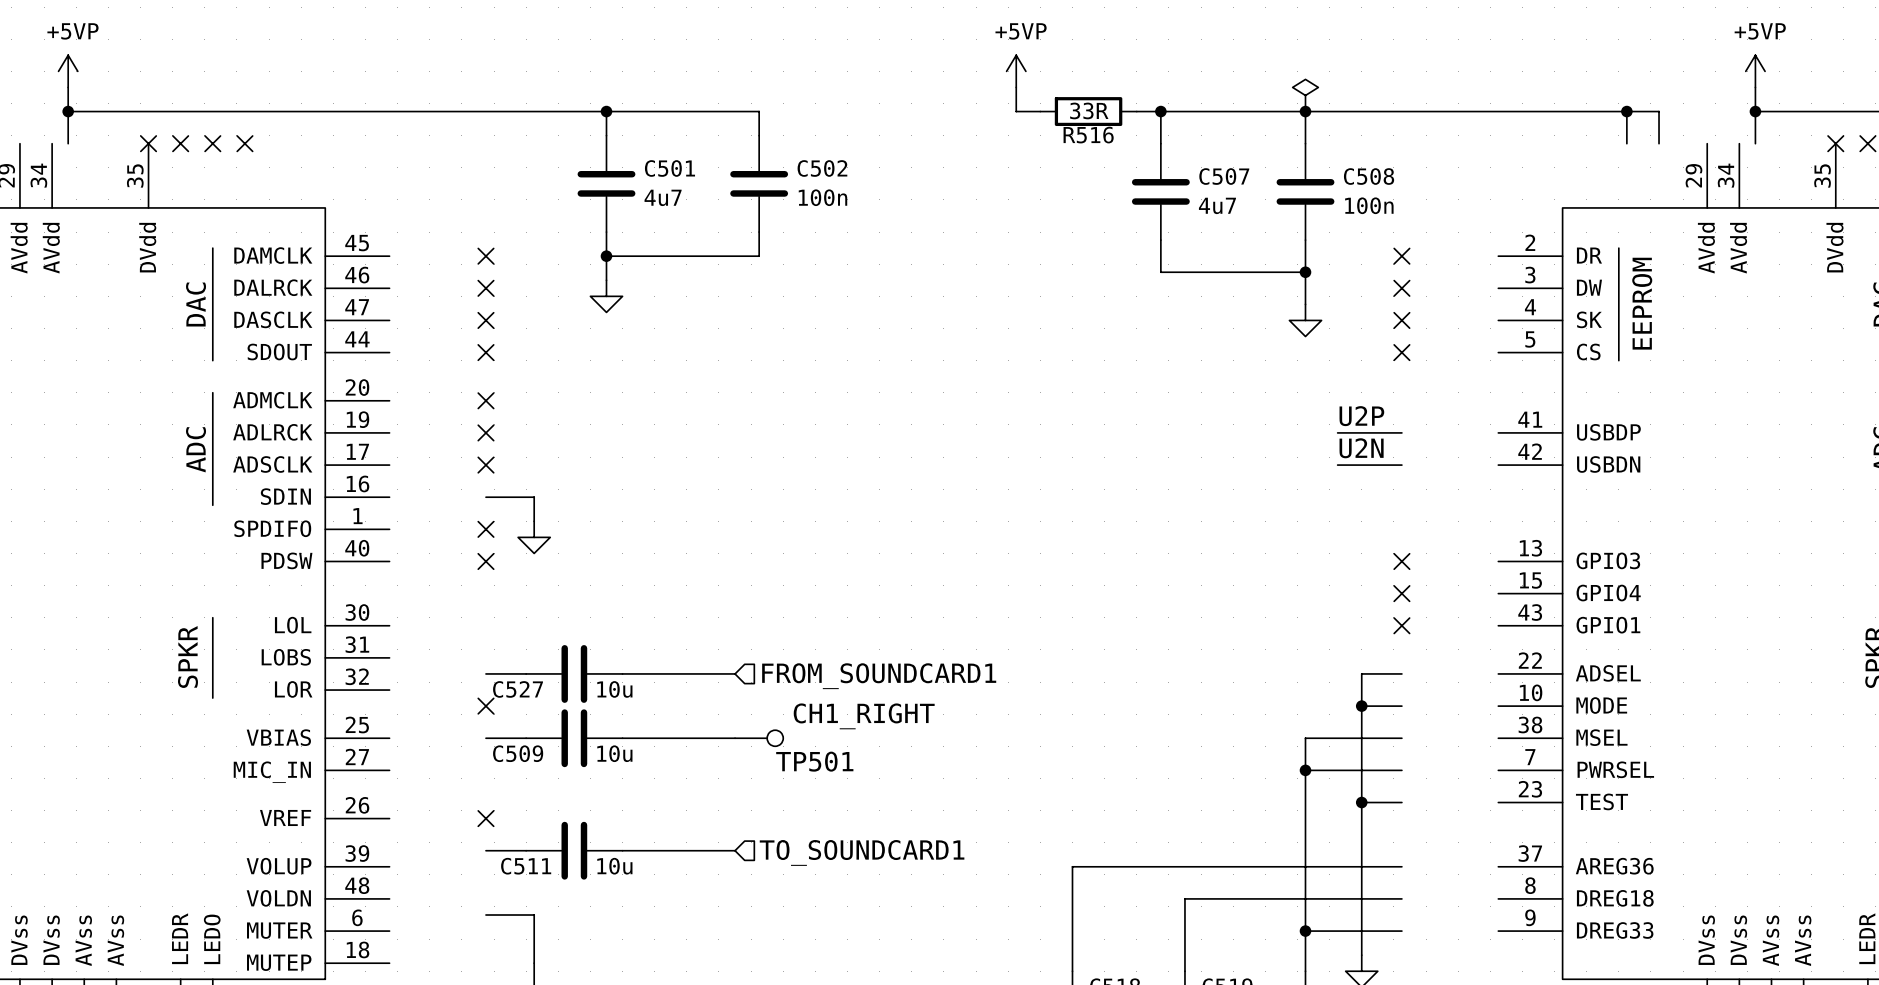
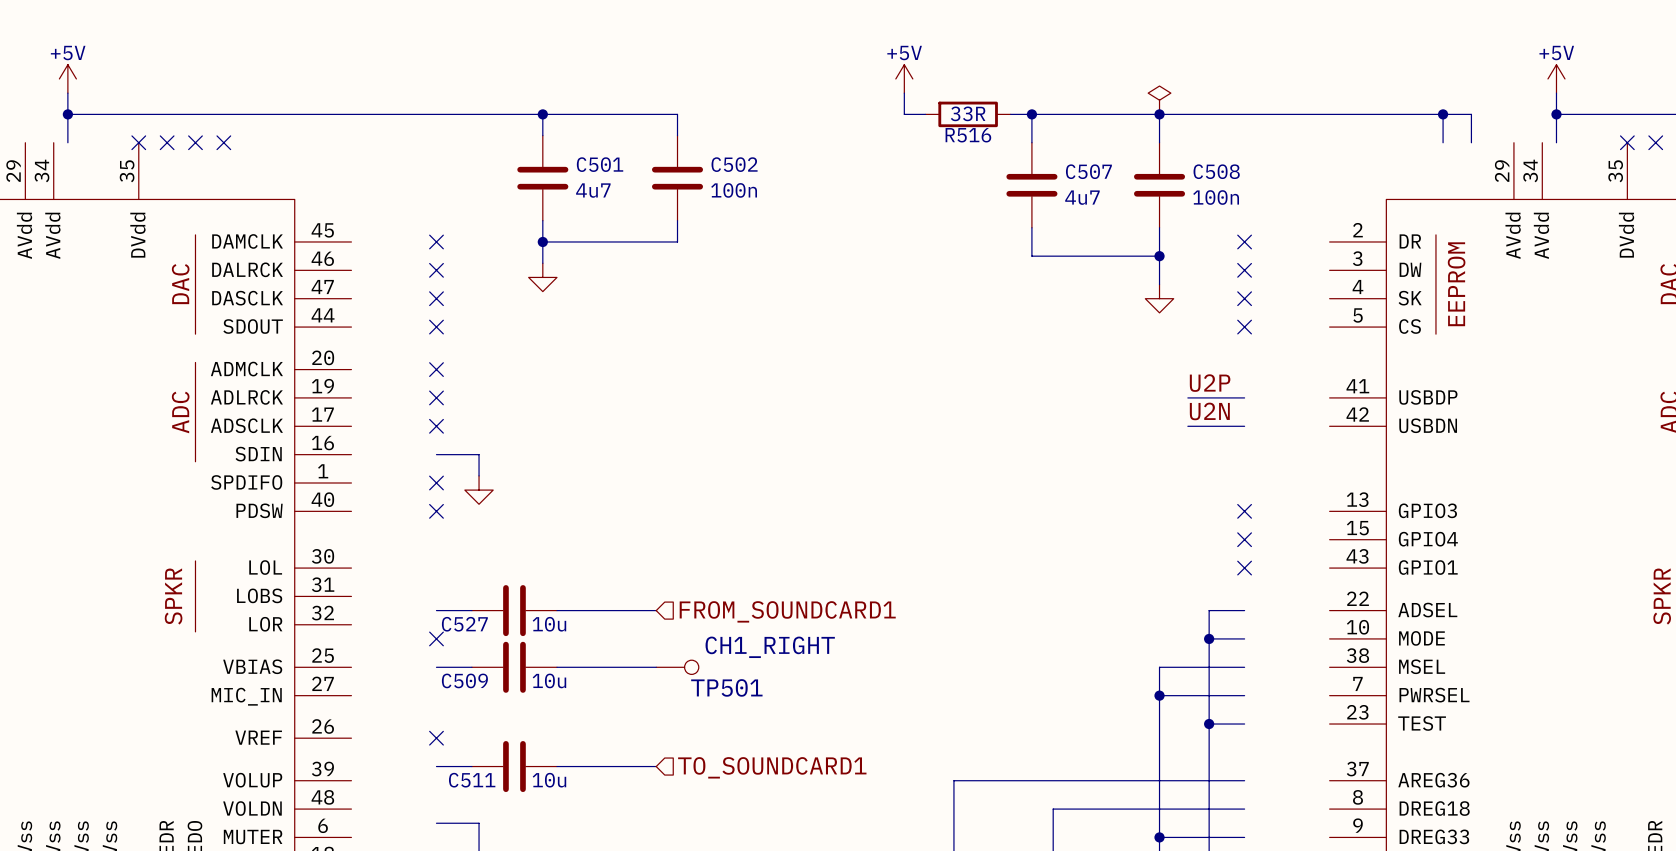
power symbol: +5VP (68, 71) -> +5V (67, 78)
power symbol: +5VP (1016, 71) -> +5V (904, 78)
power symbol: +5VP (1755, 71) -> +5V (1556, 78)

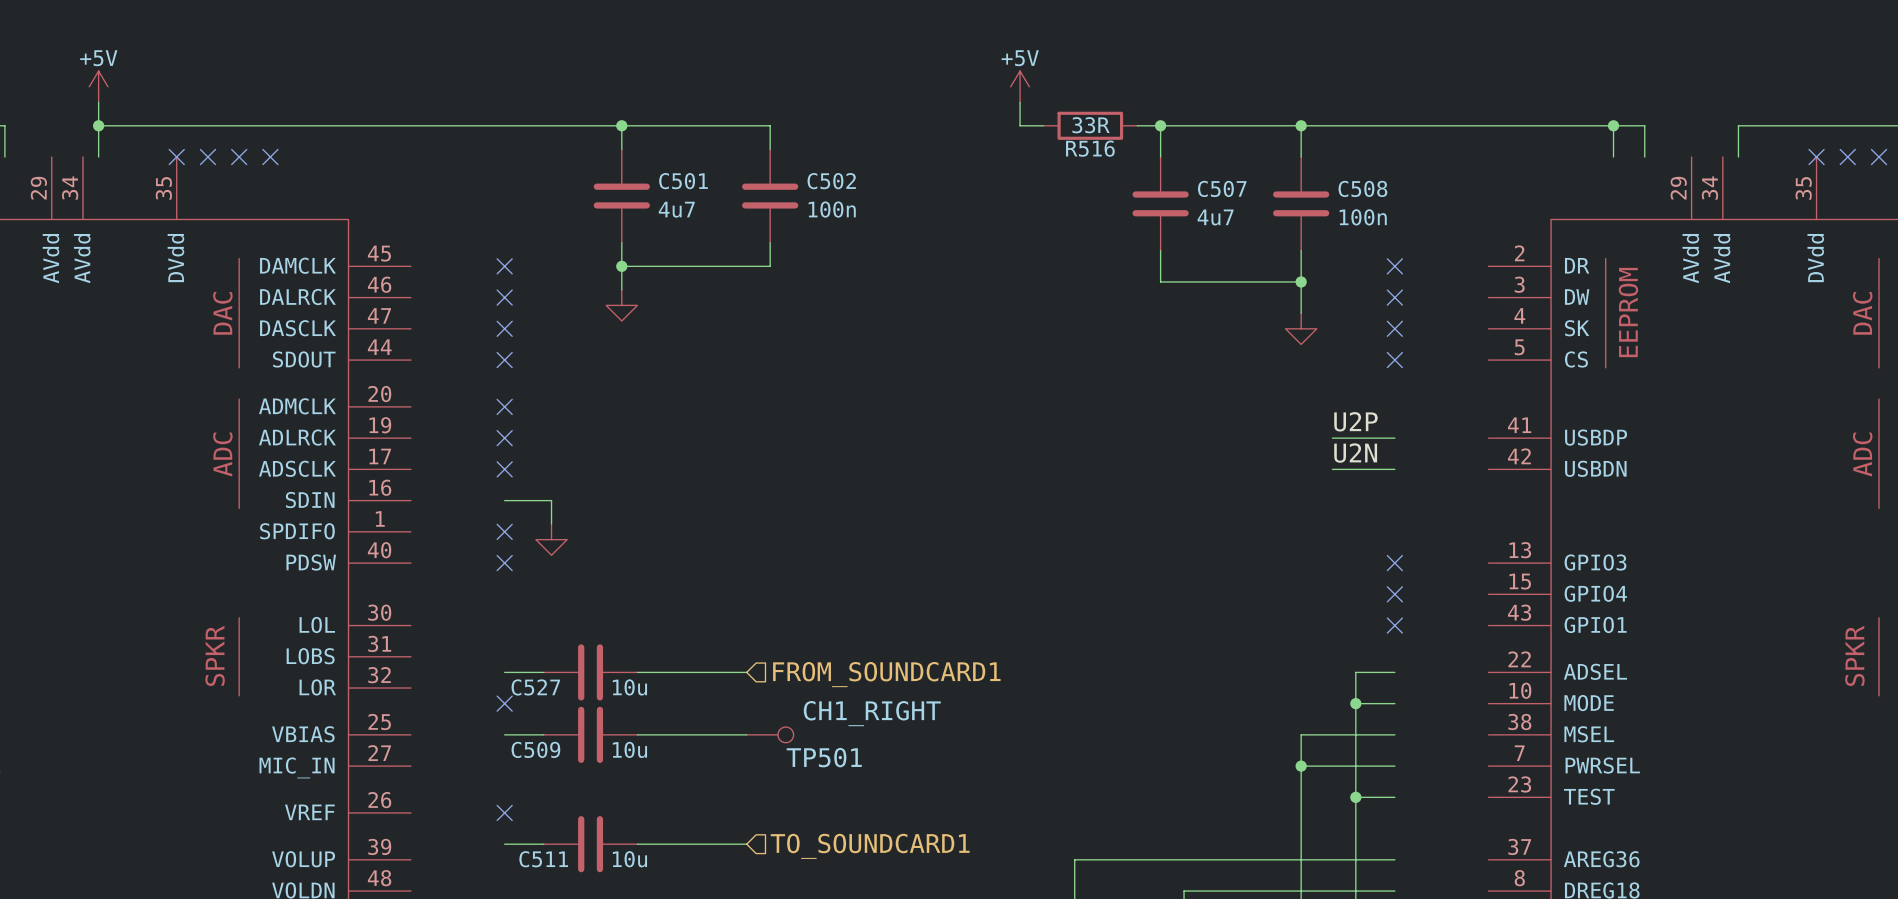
power symbol: +5V (1556, 78) -> none
wire: (1556, 93) (1556, 114) -> none
power symbol: (1159, 100) -> none
junction: (1556, 114) -> none

